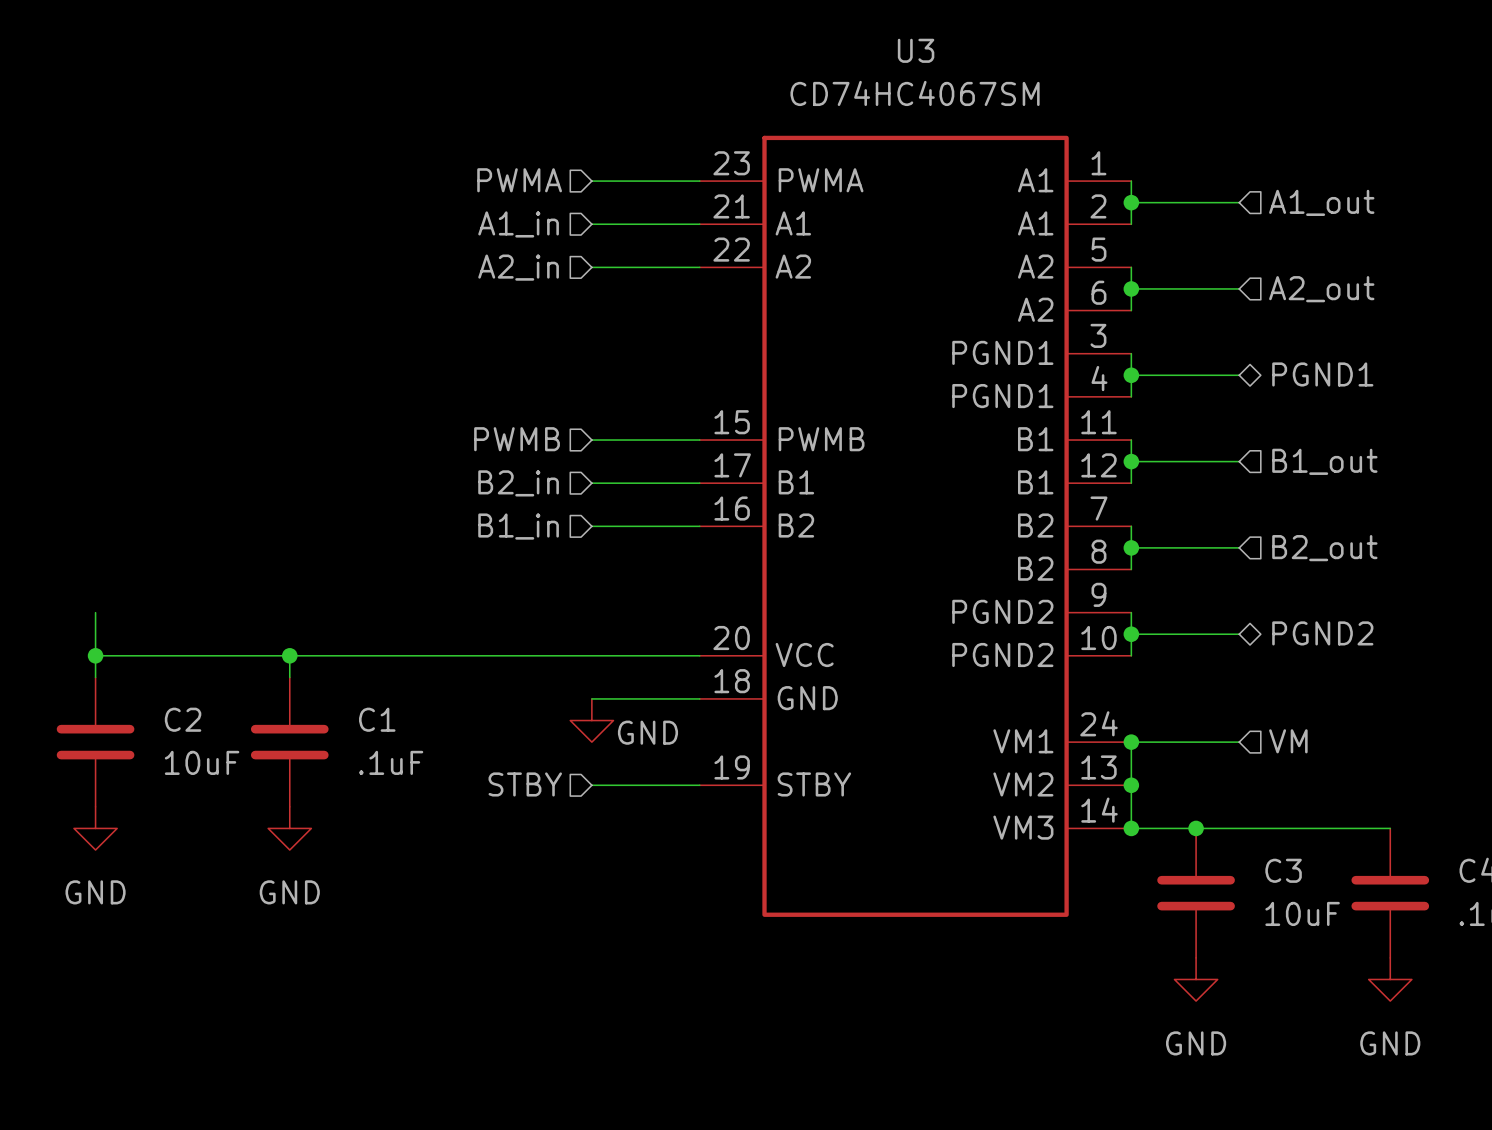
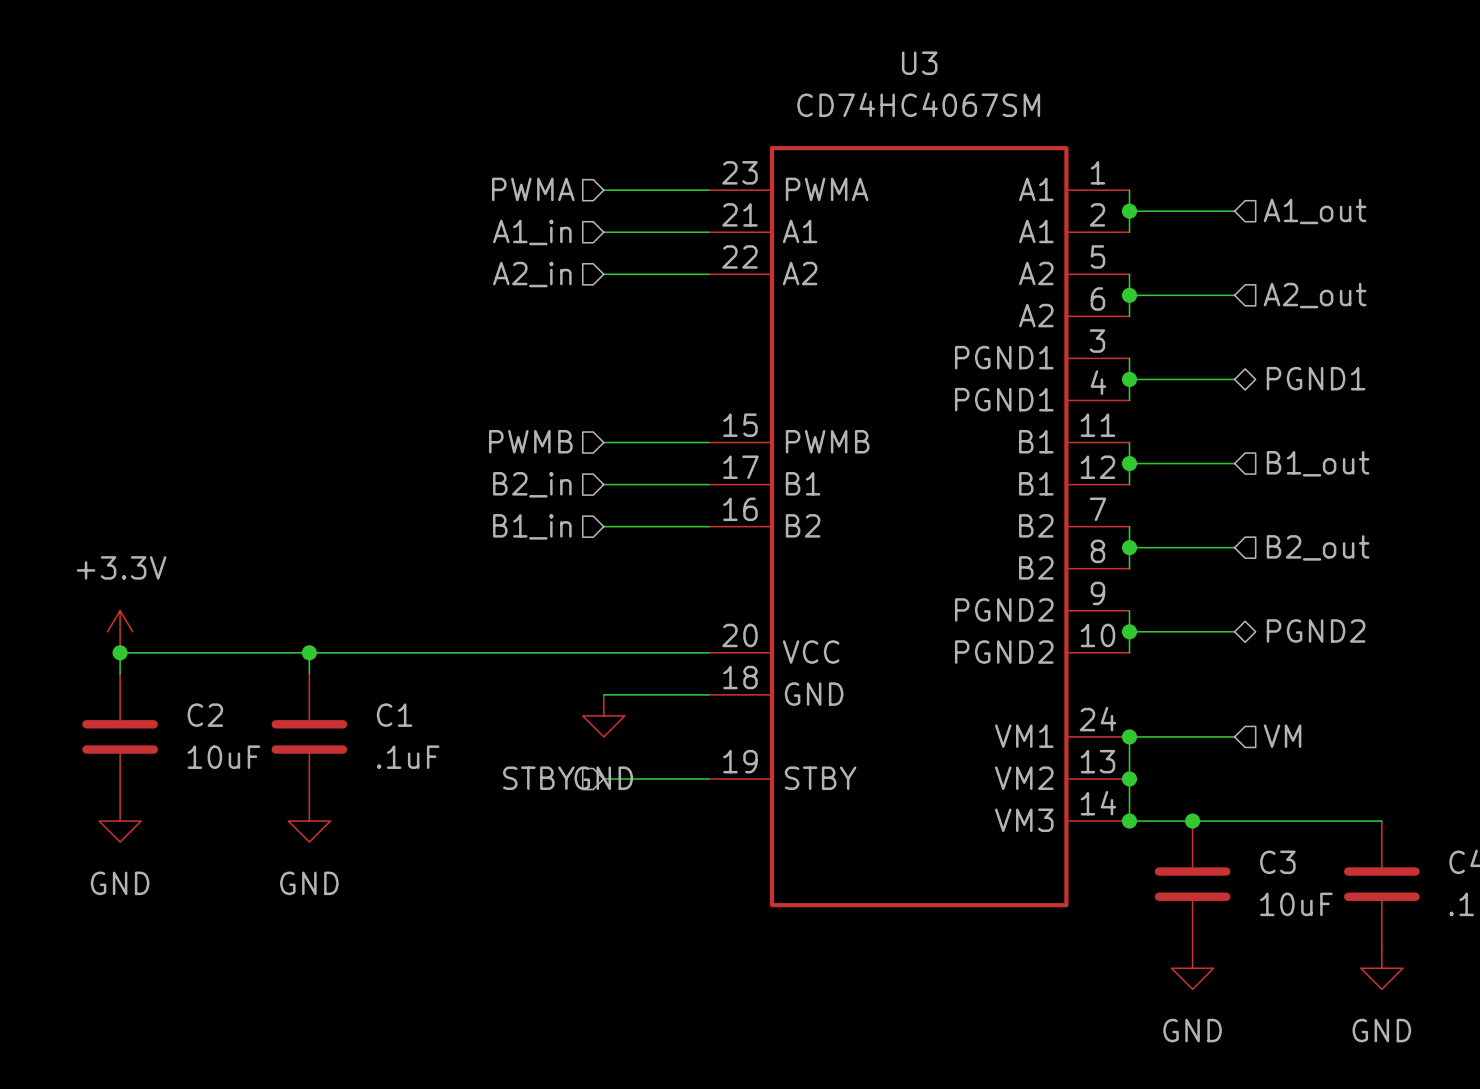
power symbol: none -> +3.3V (120, 631)
power symbol text position: GND (647, 732) -> GND (603, 778)

